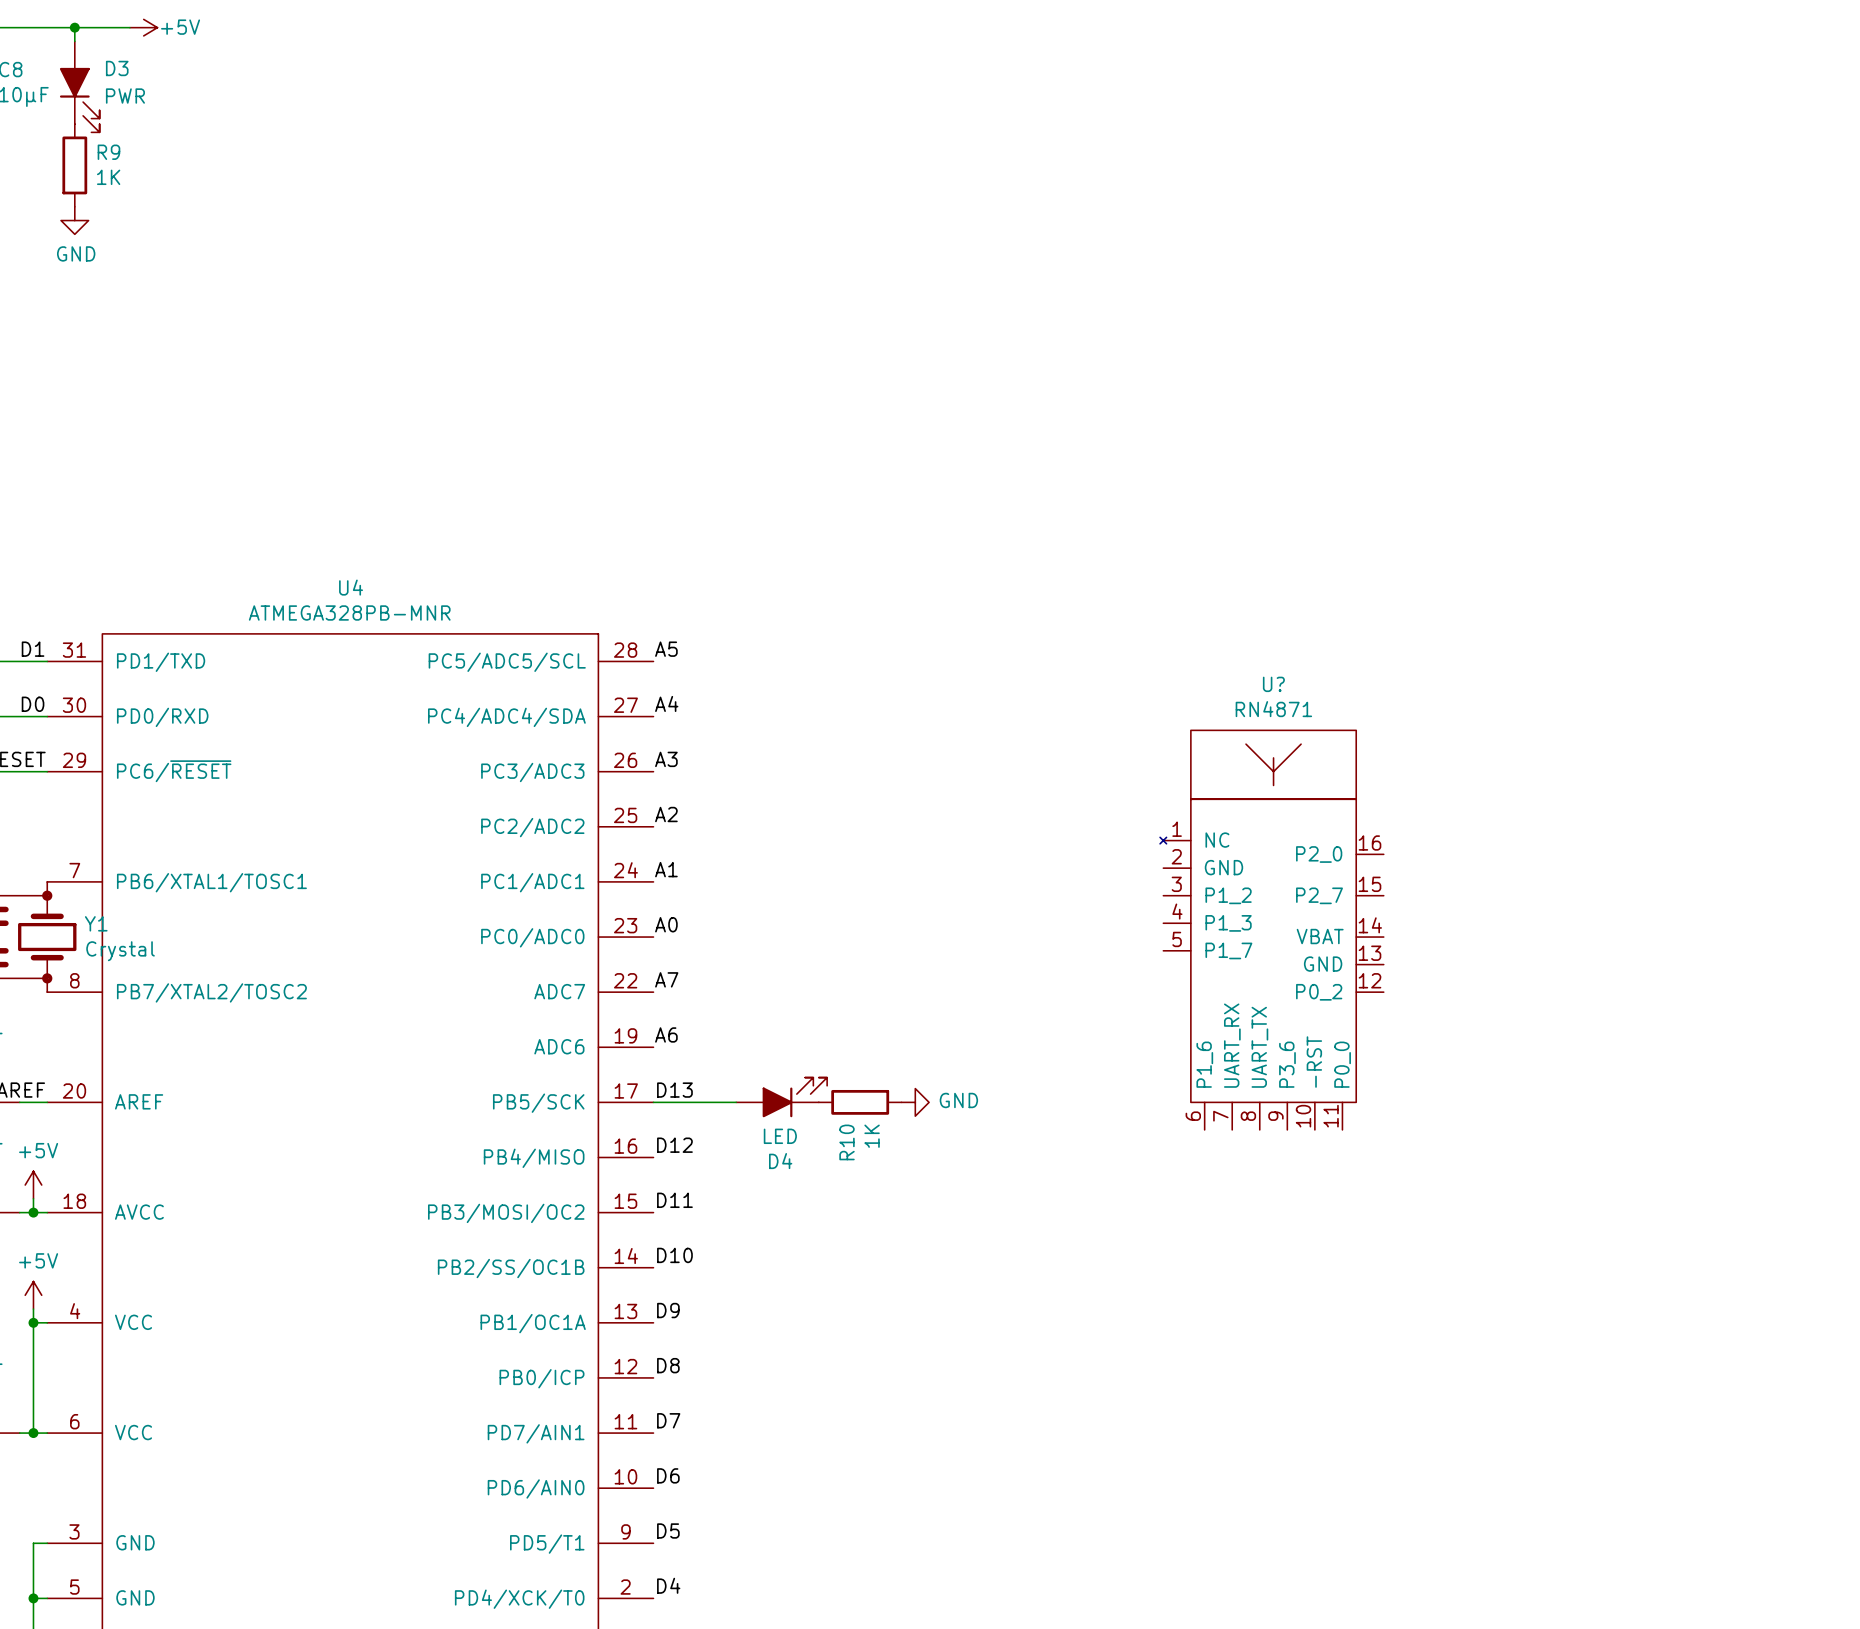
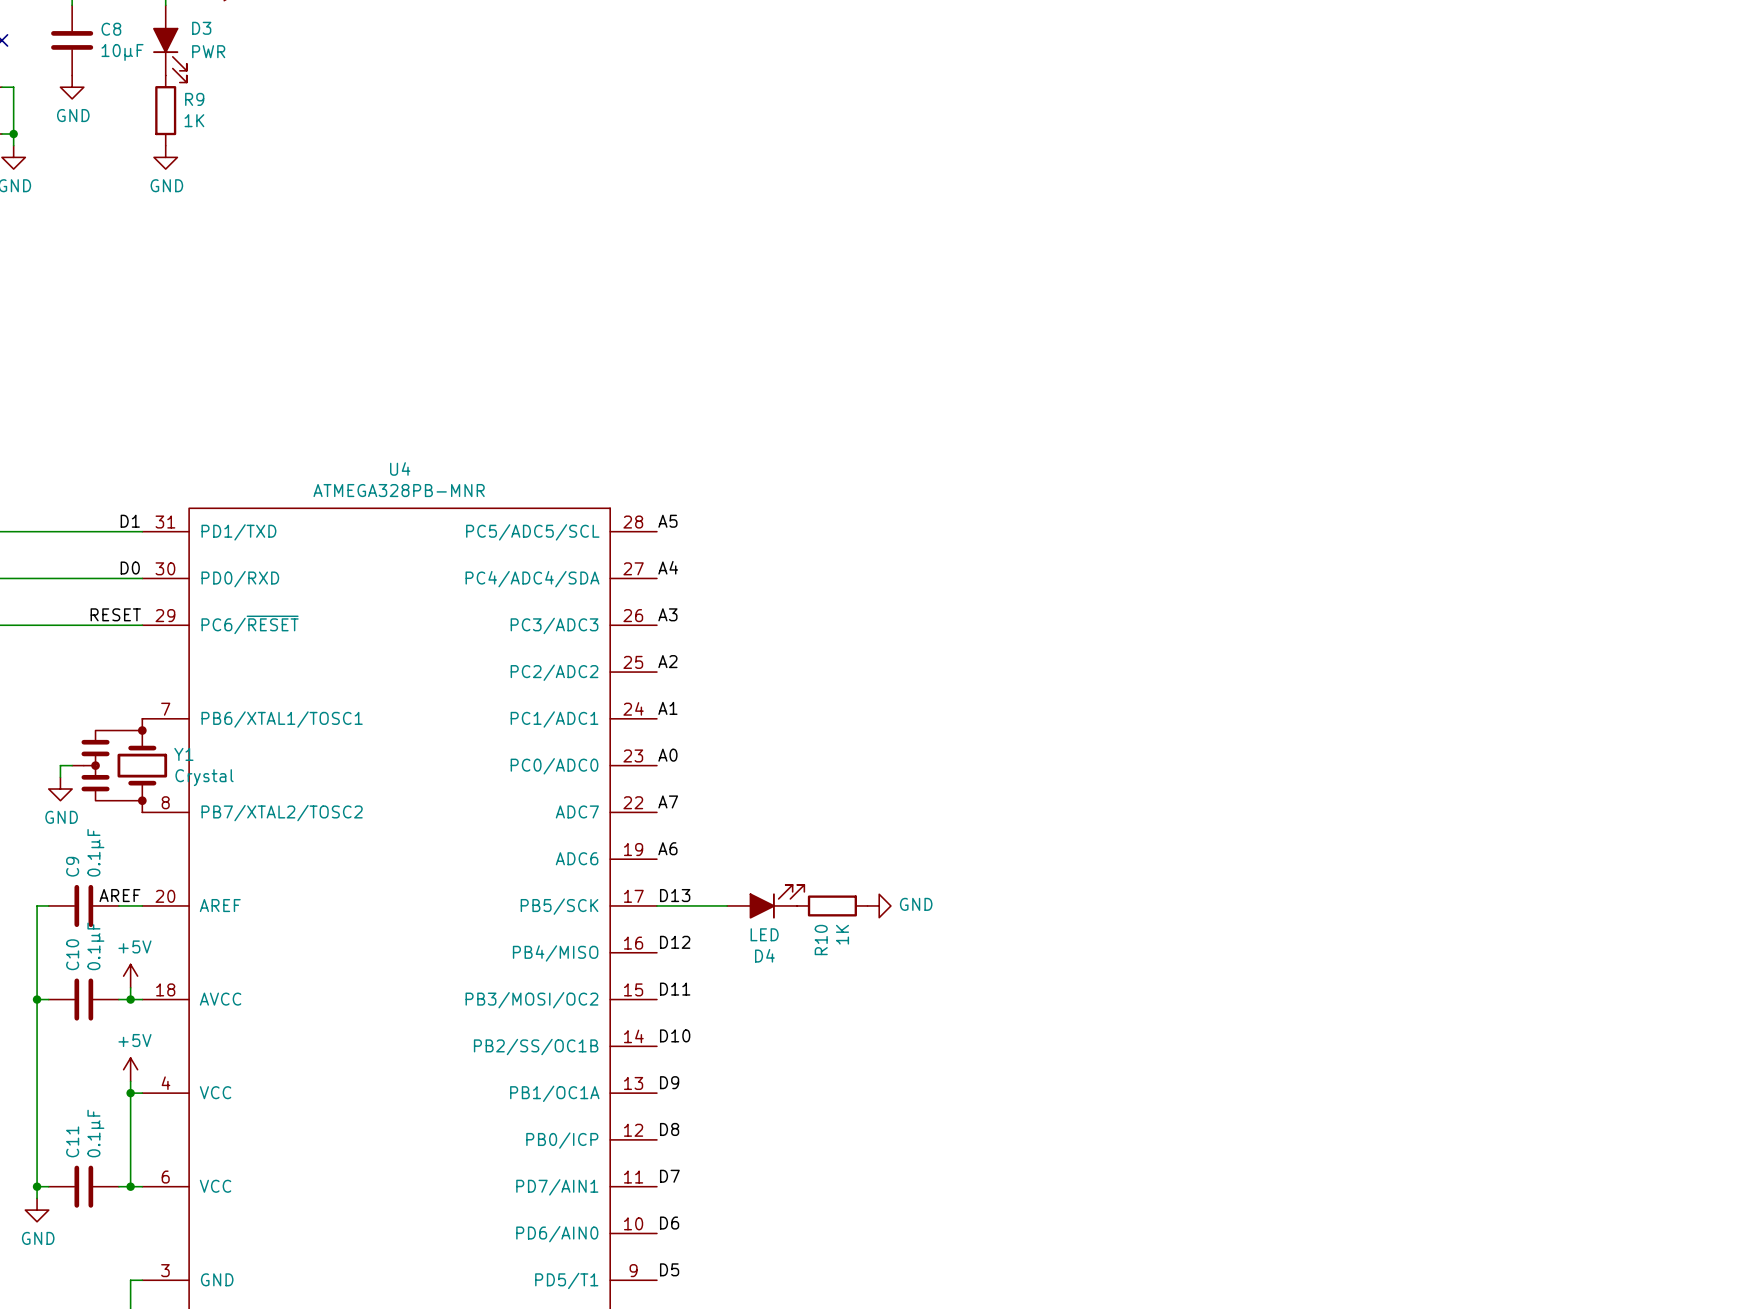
U?: RN4871 (1271, 930) -> none

